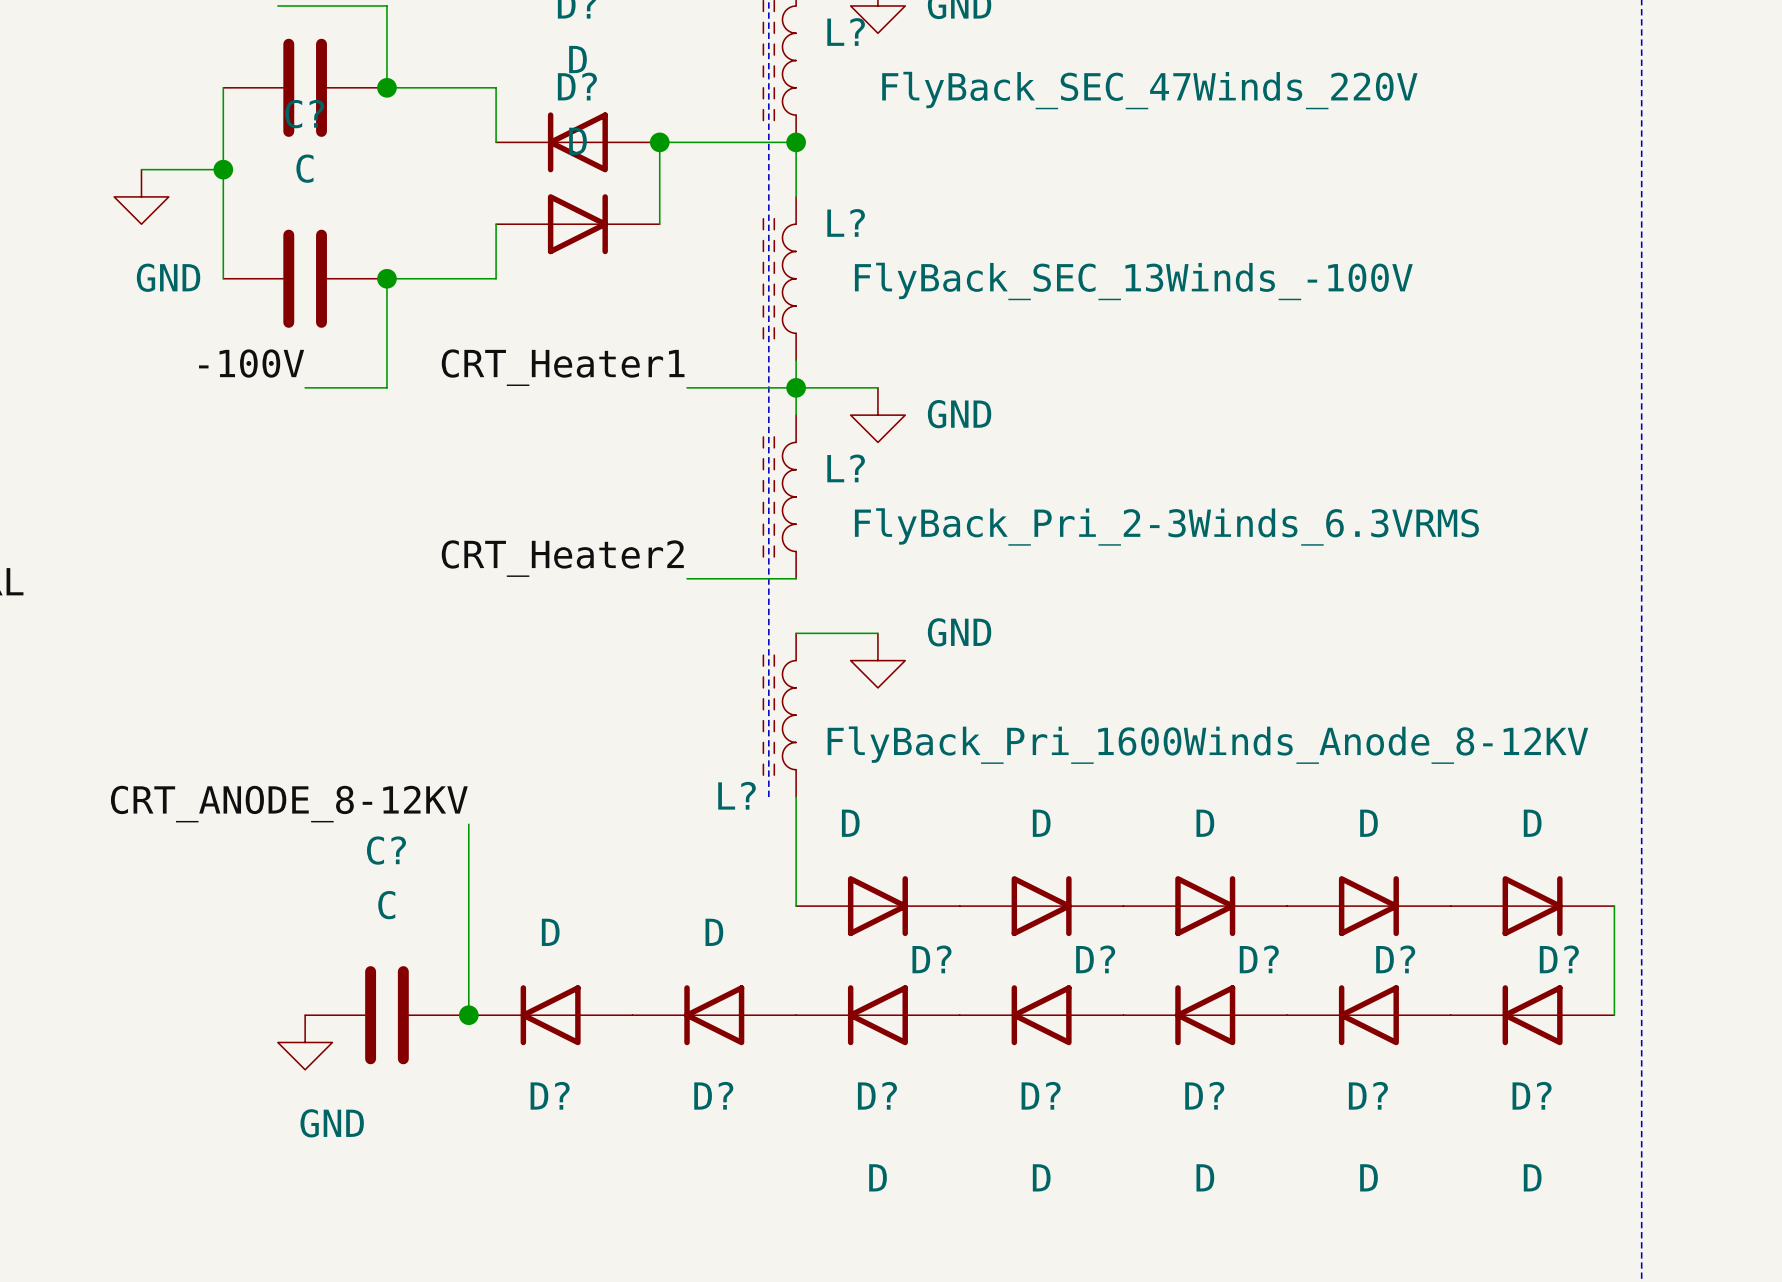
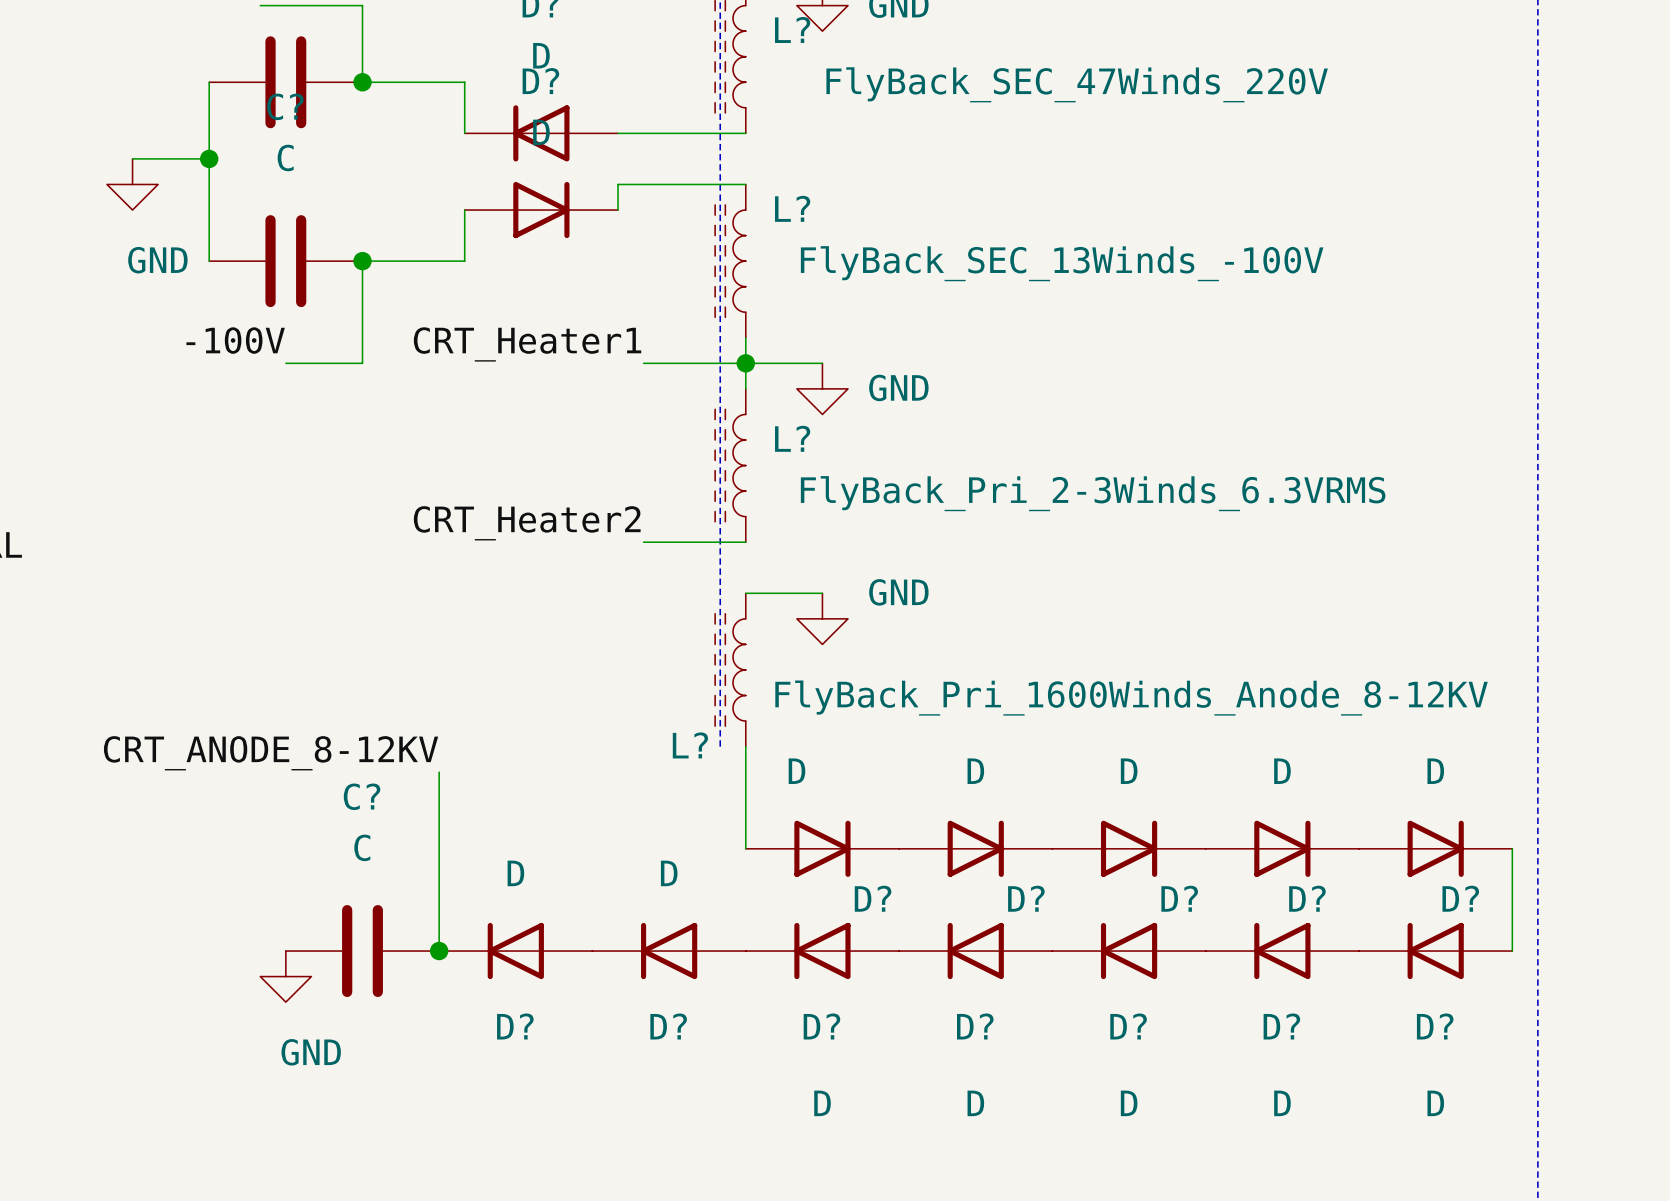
wire: (659, 142) (659, 196) -> (745, 184) (618, 184)
junction: (659, 142) -> none
wire: (796, 142) (796, 196) -> none
junction: (796, 142) -> none

